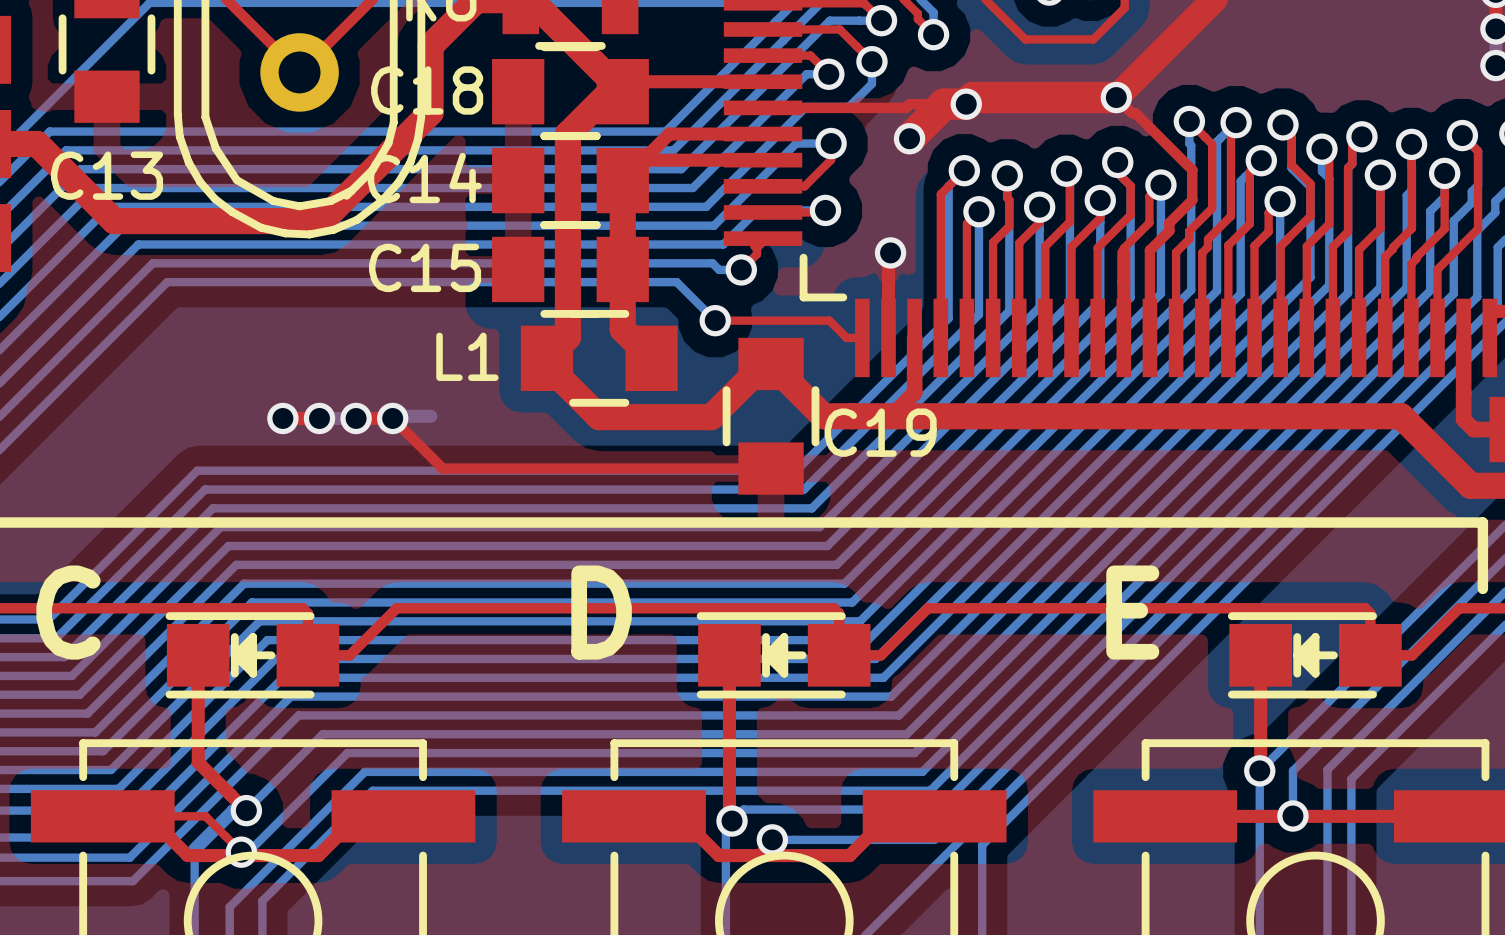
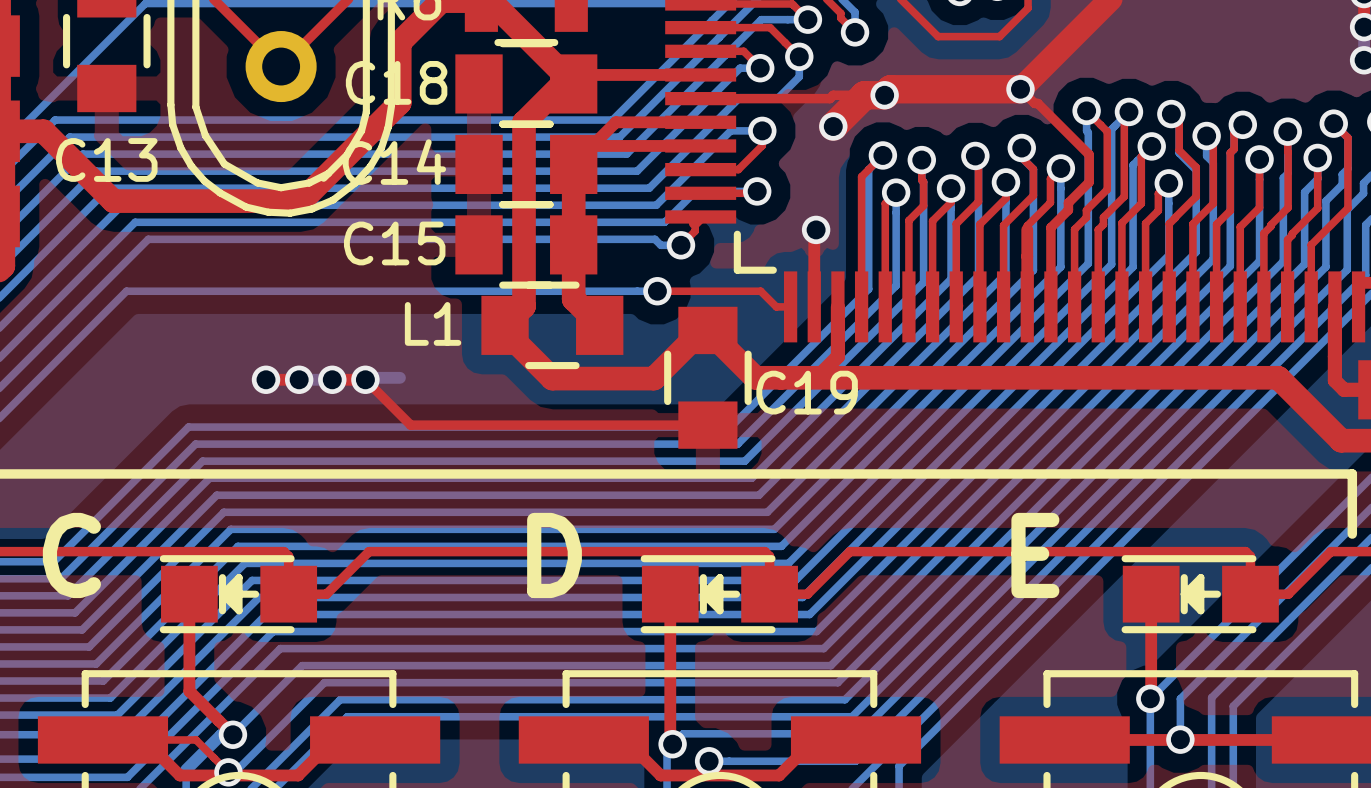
bottom track: (128, 320) (167, 282) (676, 282) (715, 320) -> (126, 291) (657, 291)

